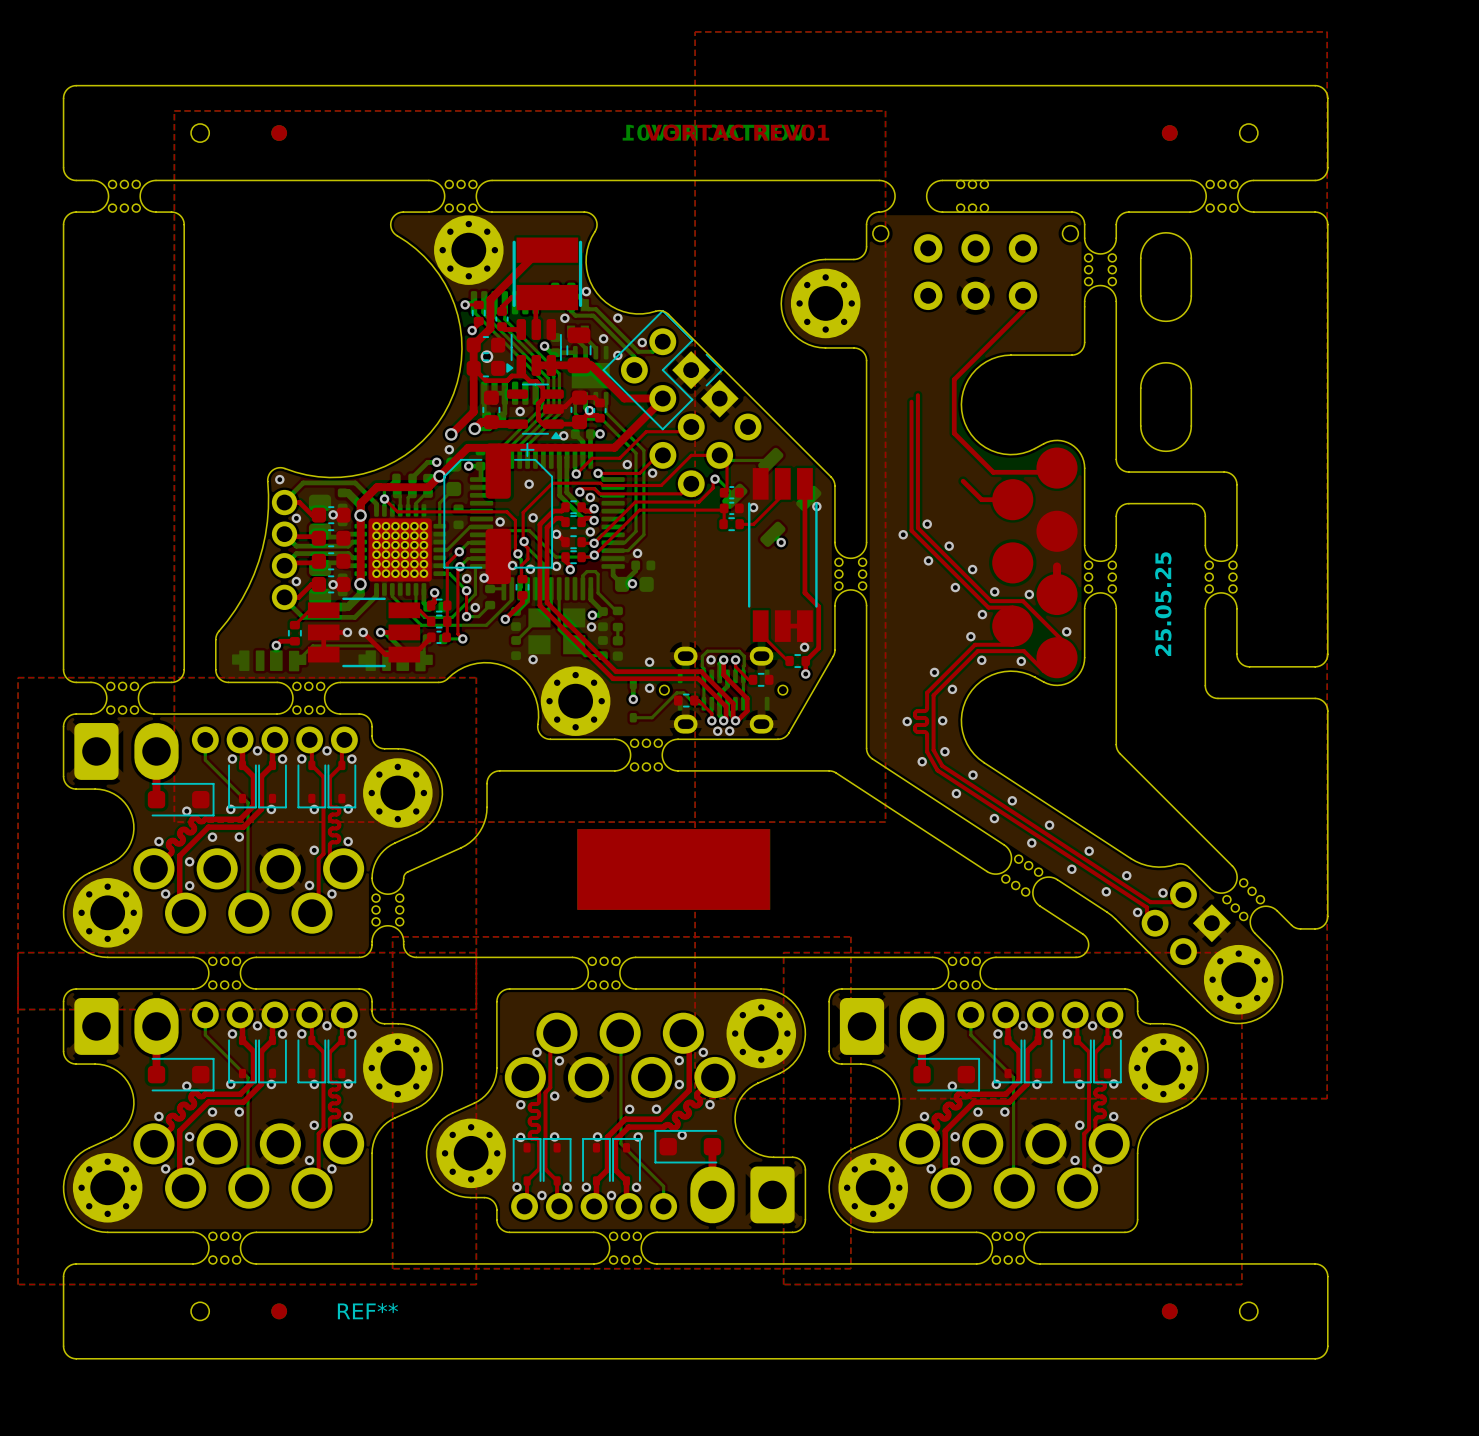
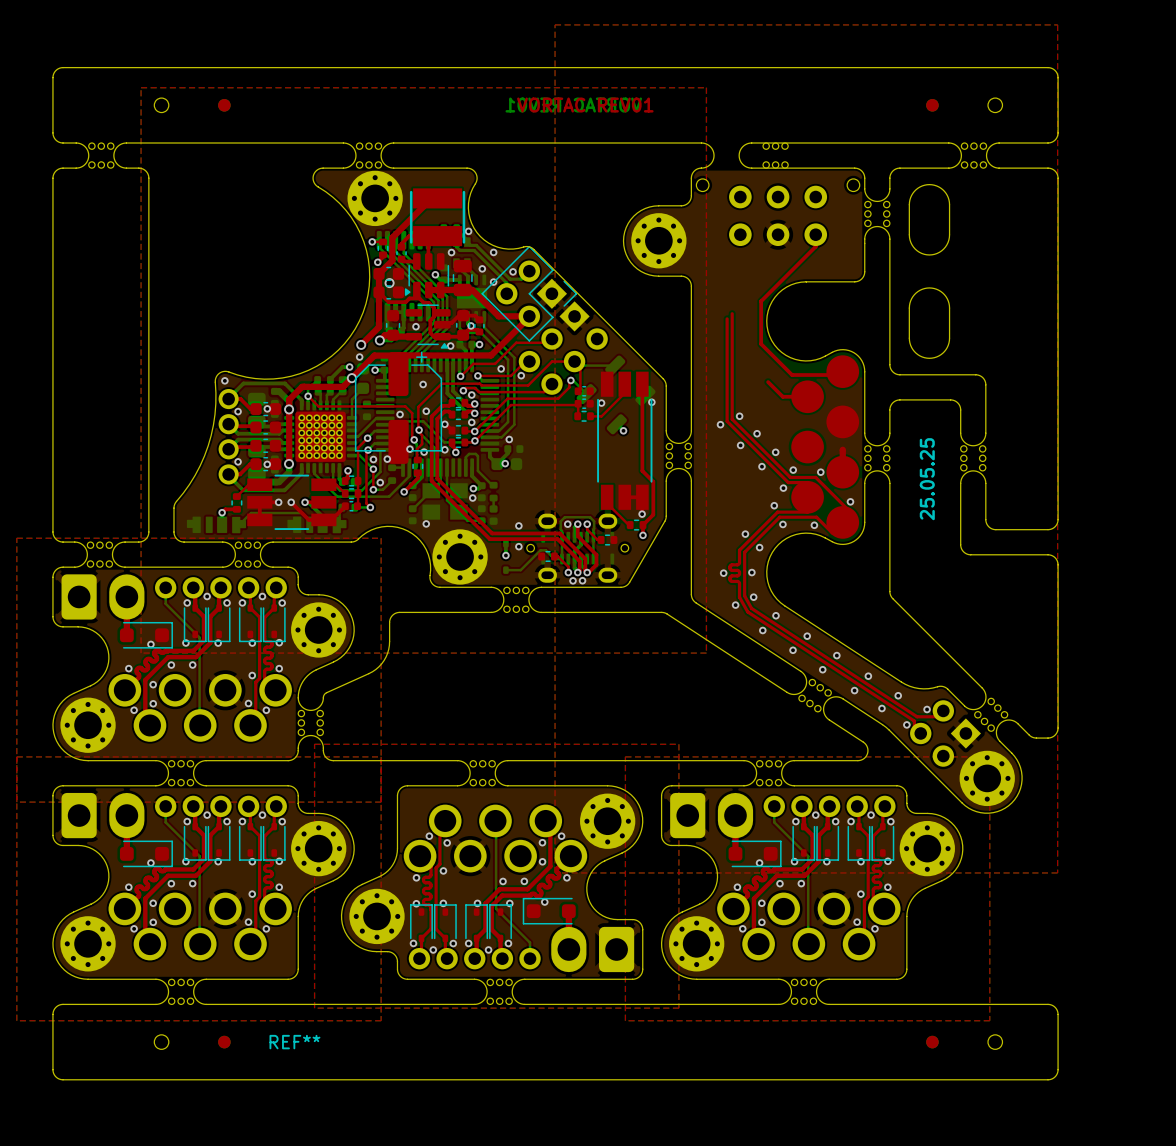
drawing: [577, 829, 771, 910] -> none

